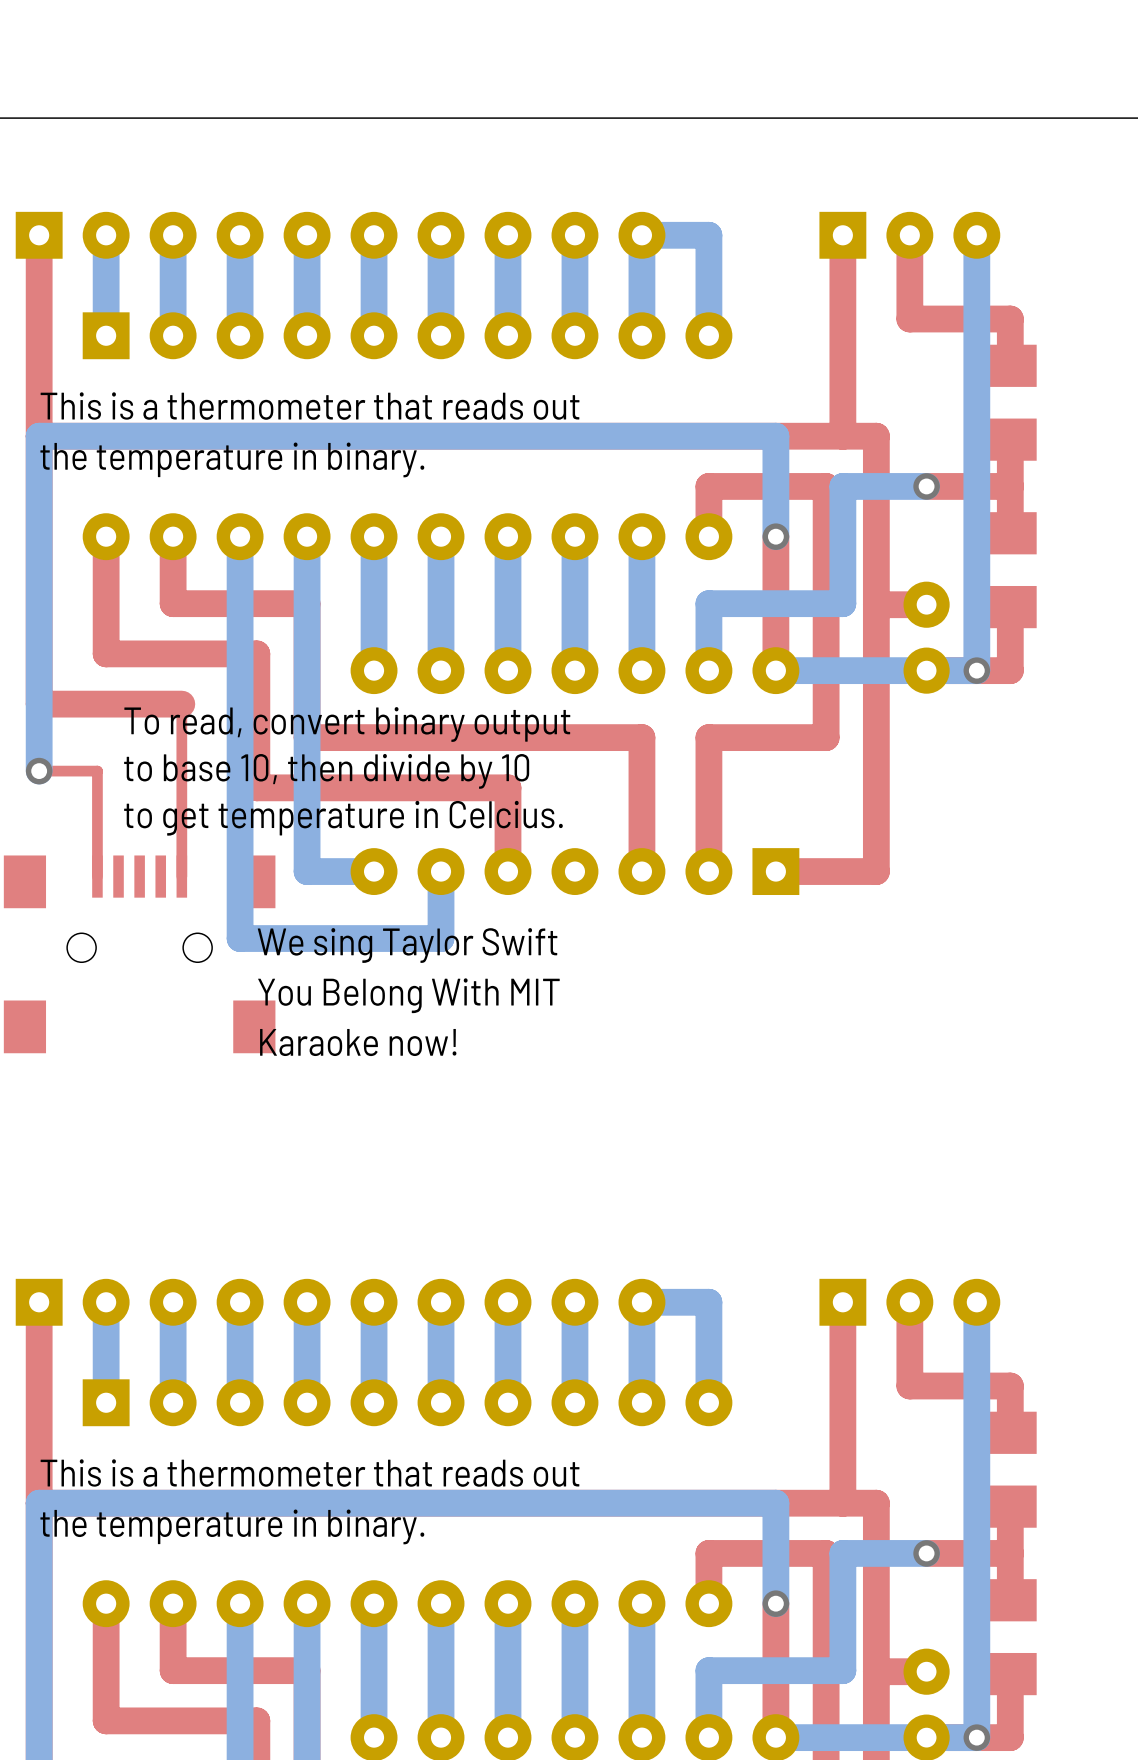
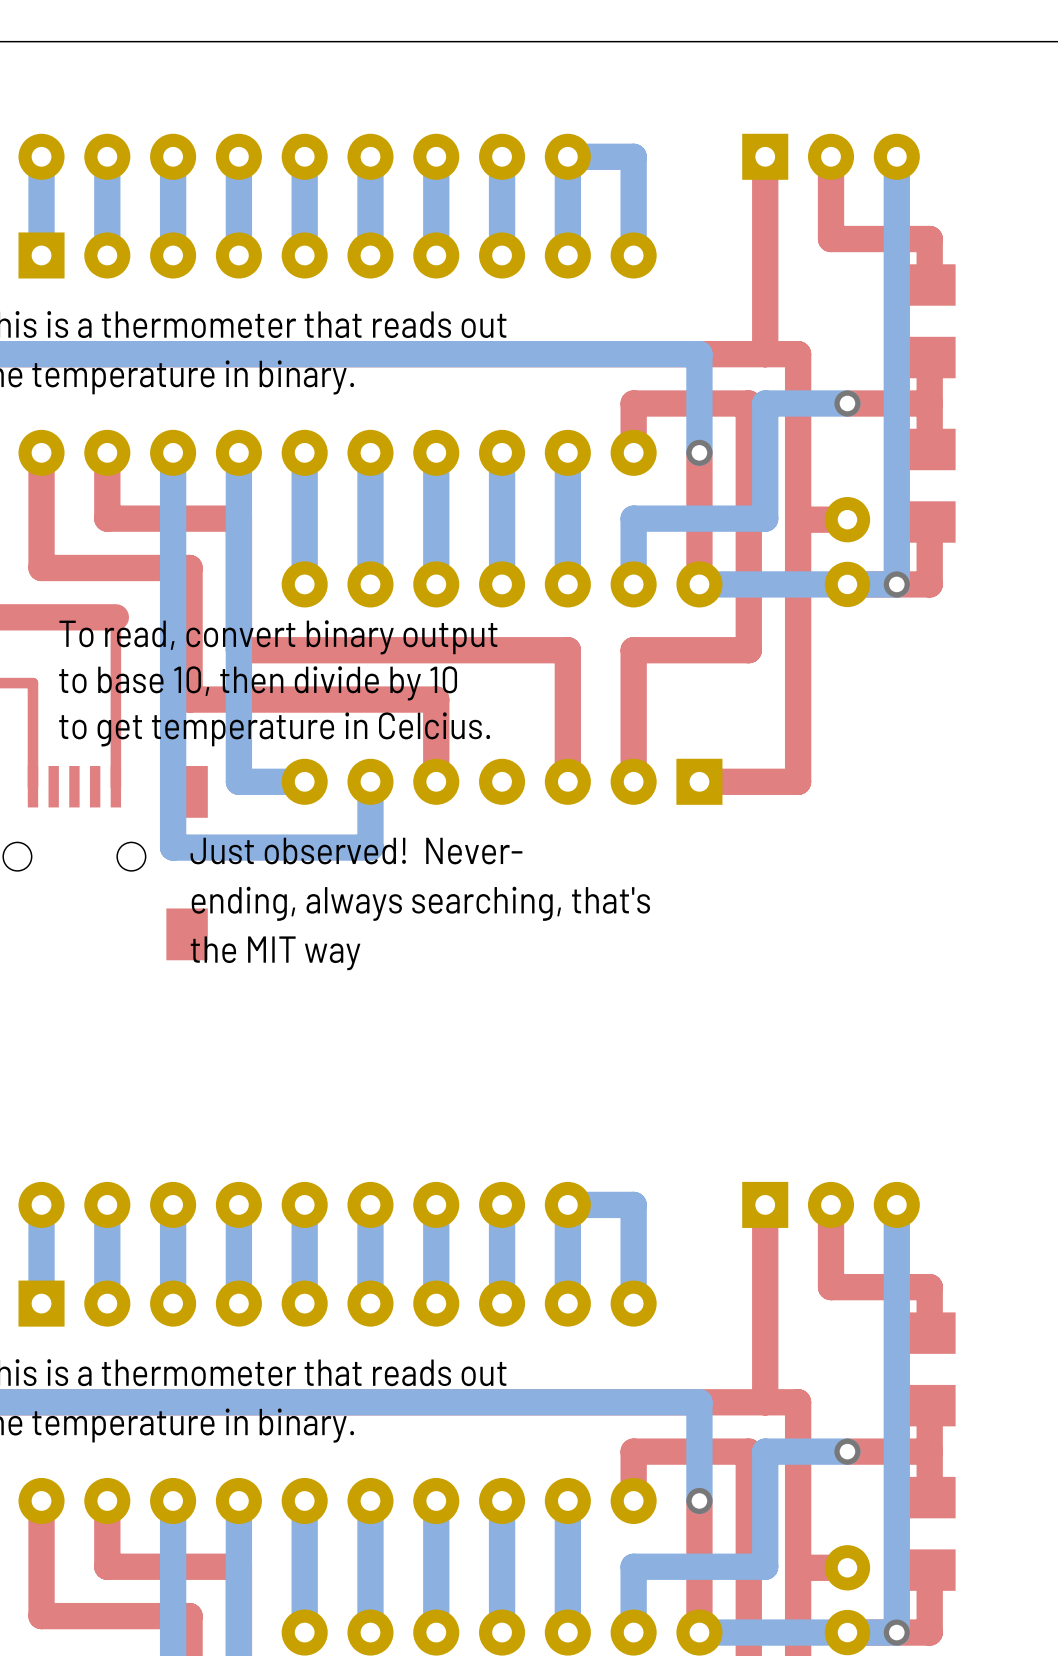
text: We sing Taylor Swift (407, 945) -> Just observed! Never- (356, 851)
text: You Belong With MIT (408, 995) -> ending, always searching, that's (420, 903)
text: Karaoke now! (358, 1042) -> the MIT way (275, 953)

